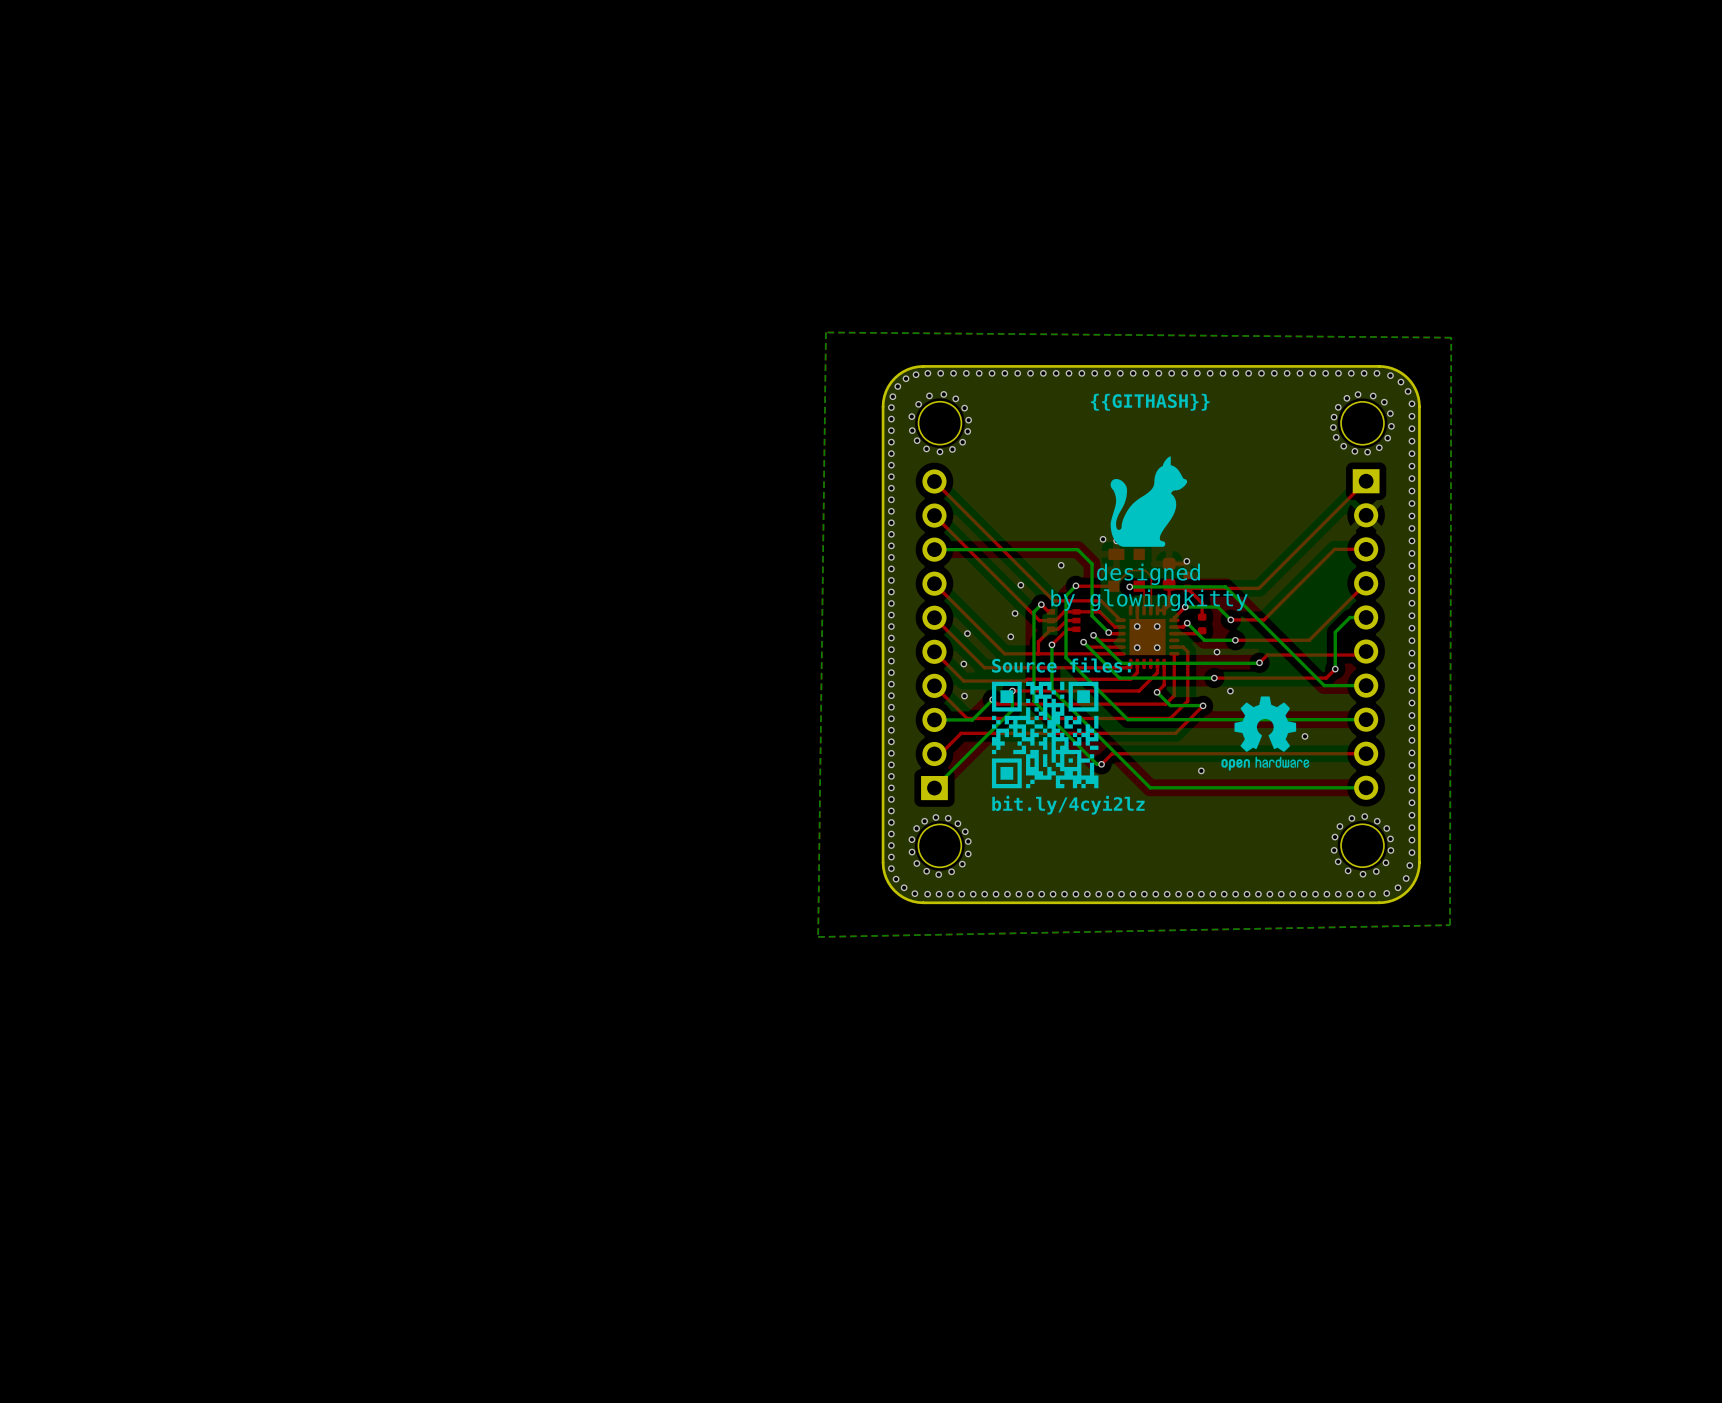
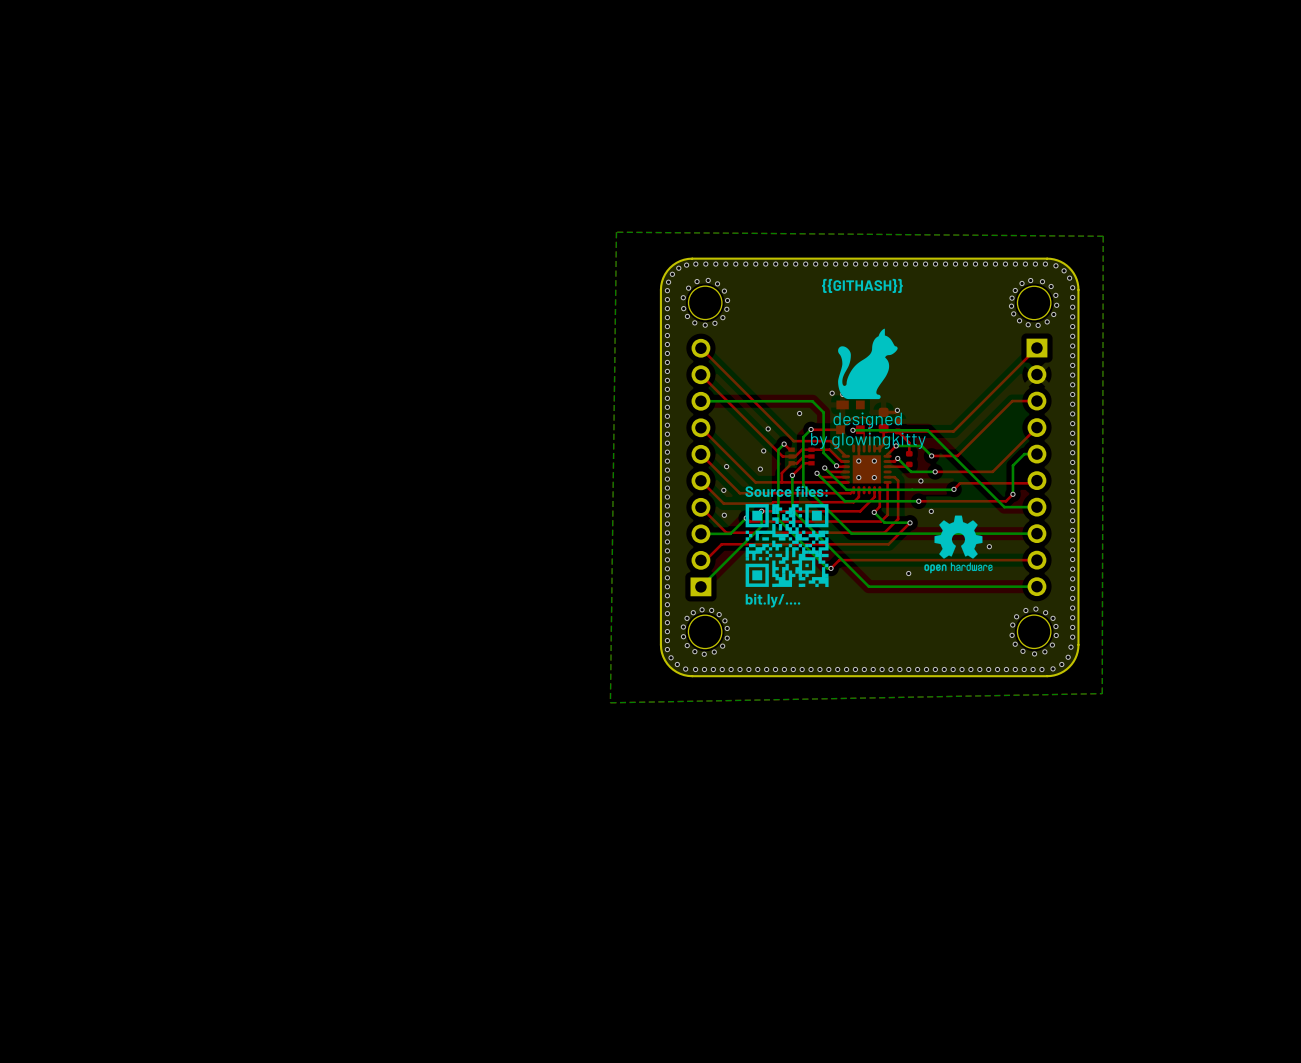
drawing: [991, 681, 1099, 789] -> none
drawing: none -> [745, 504, 829, 587]
text: bit.ly/4cyi2lz (1068, 805) -> bit.ly/.... (772, 600)

